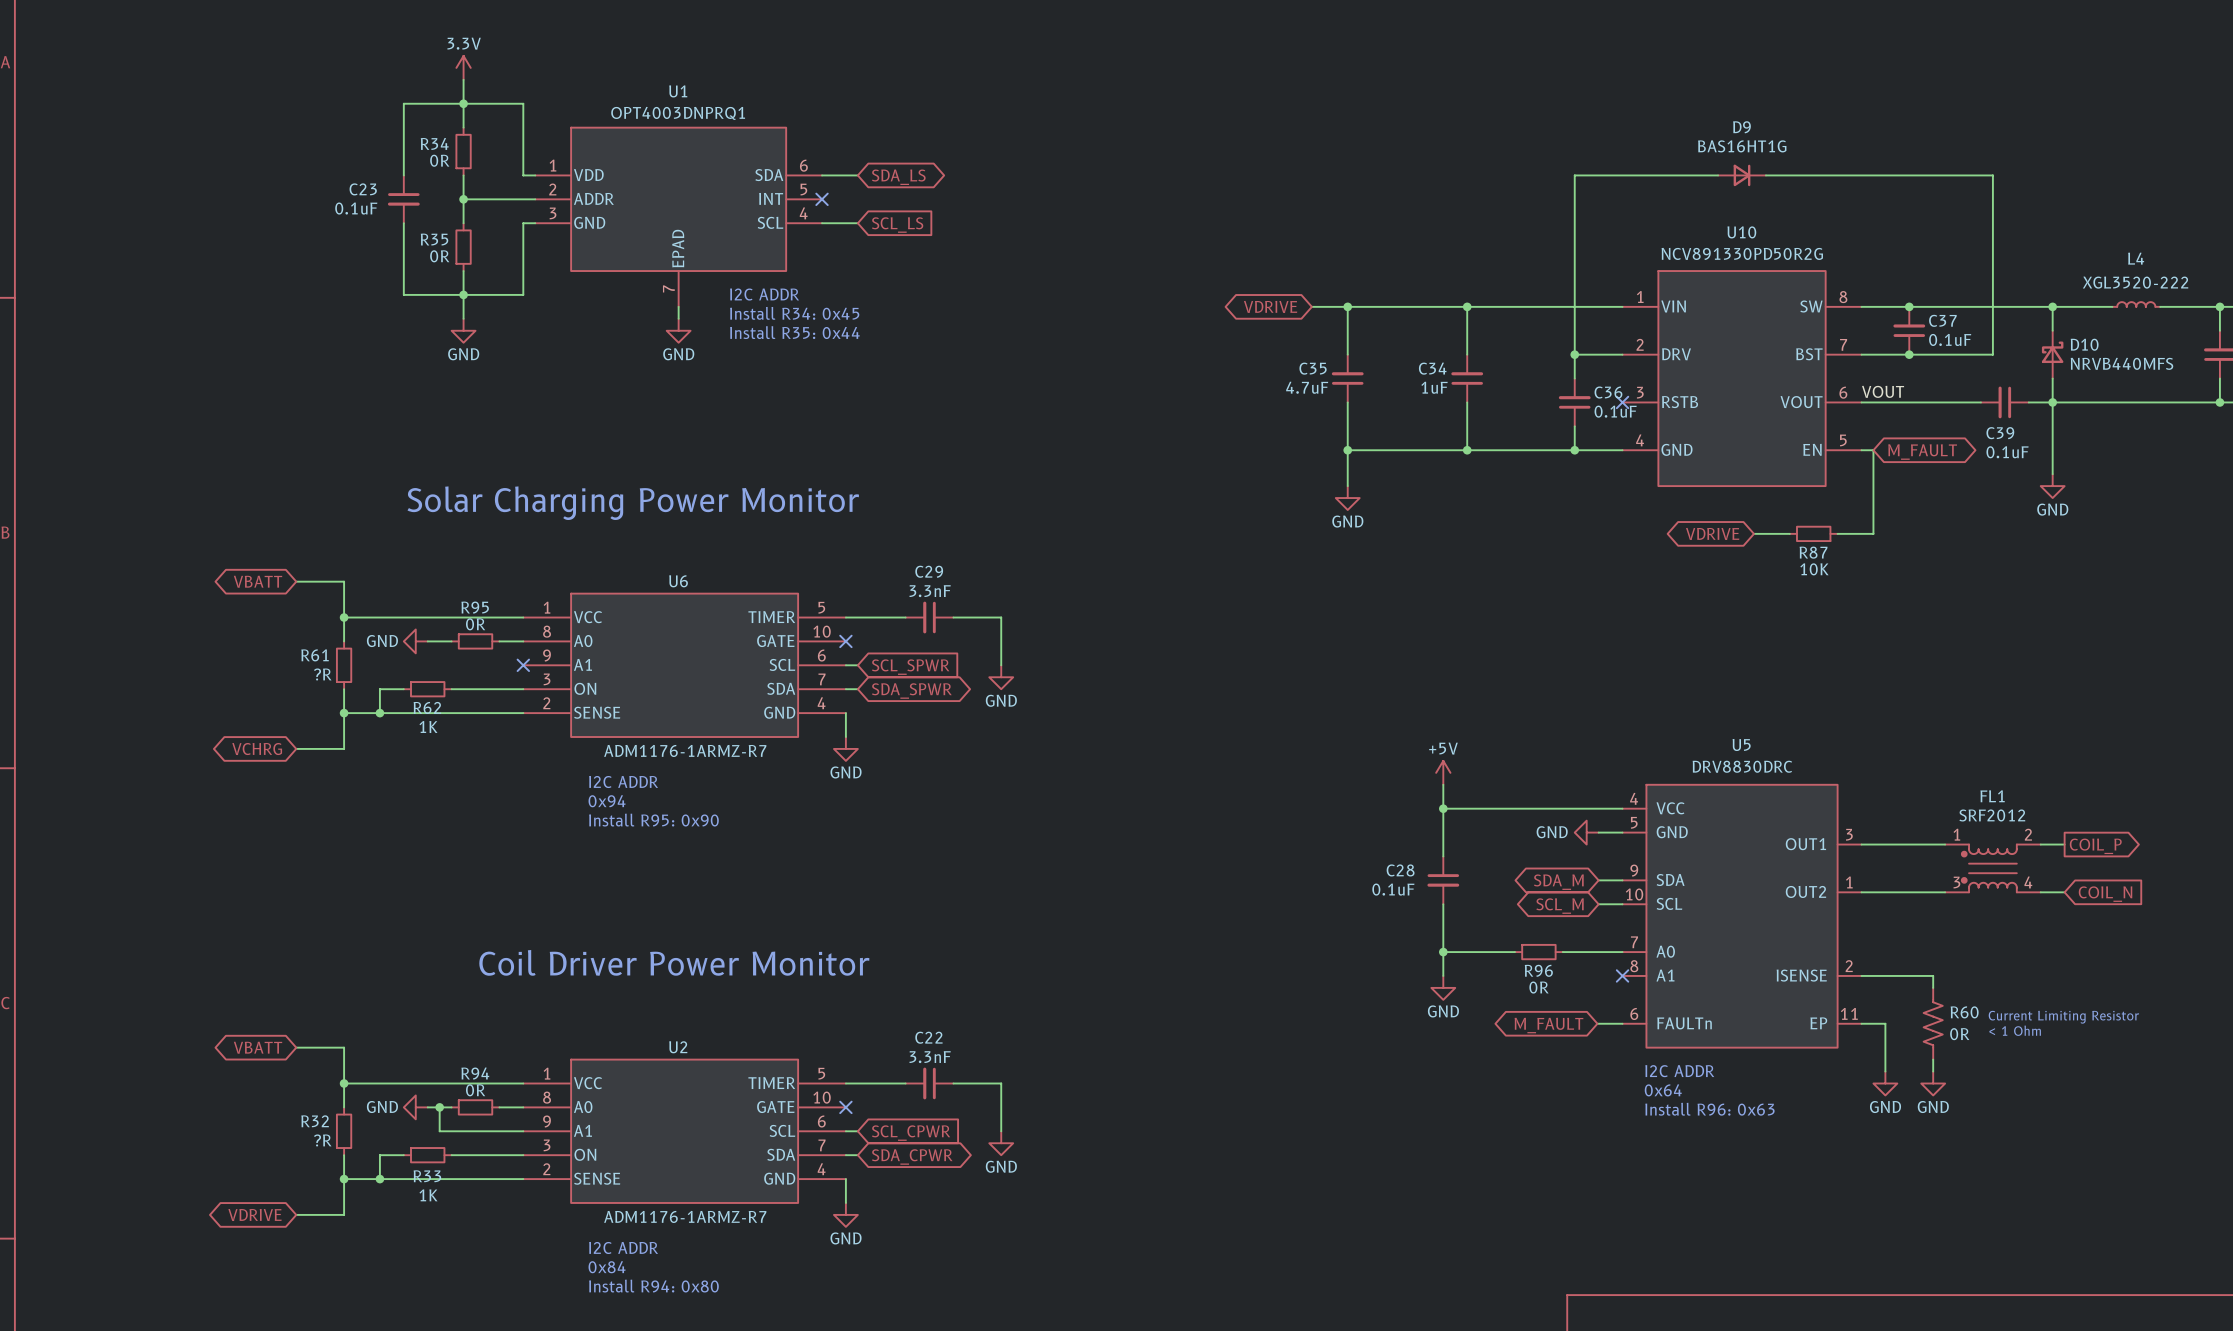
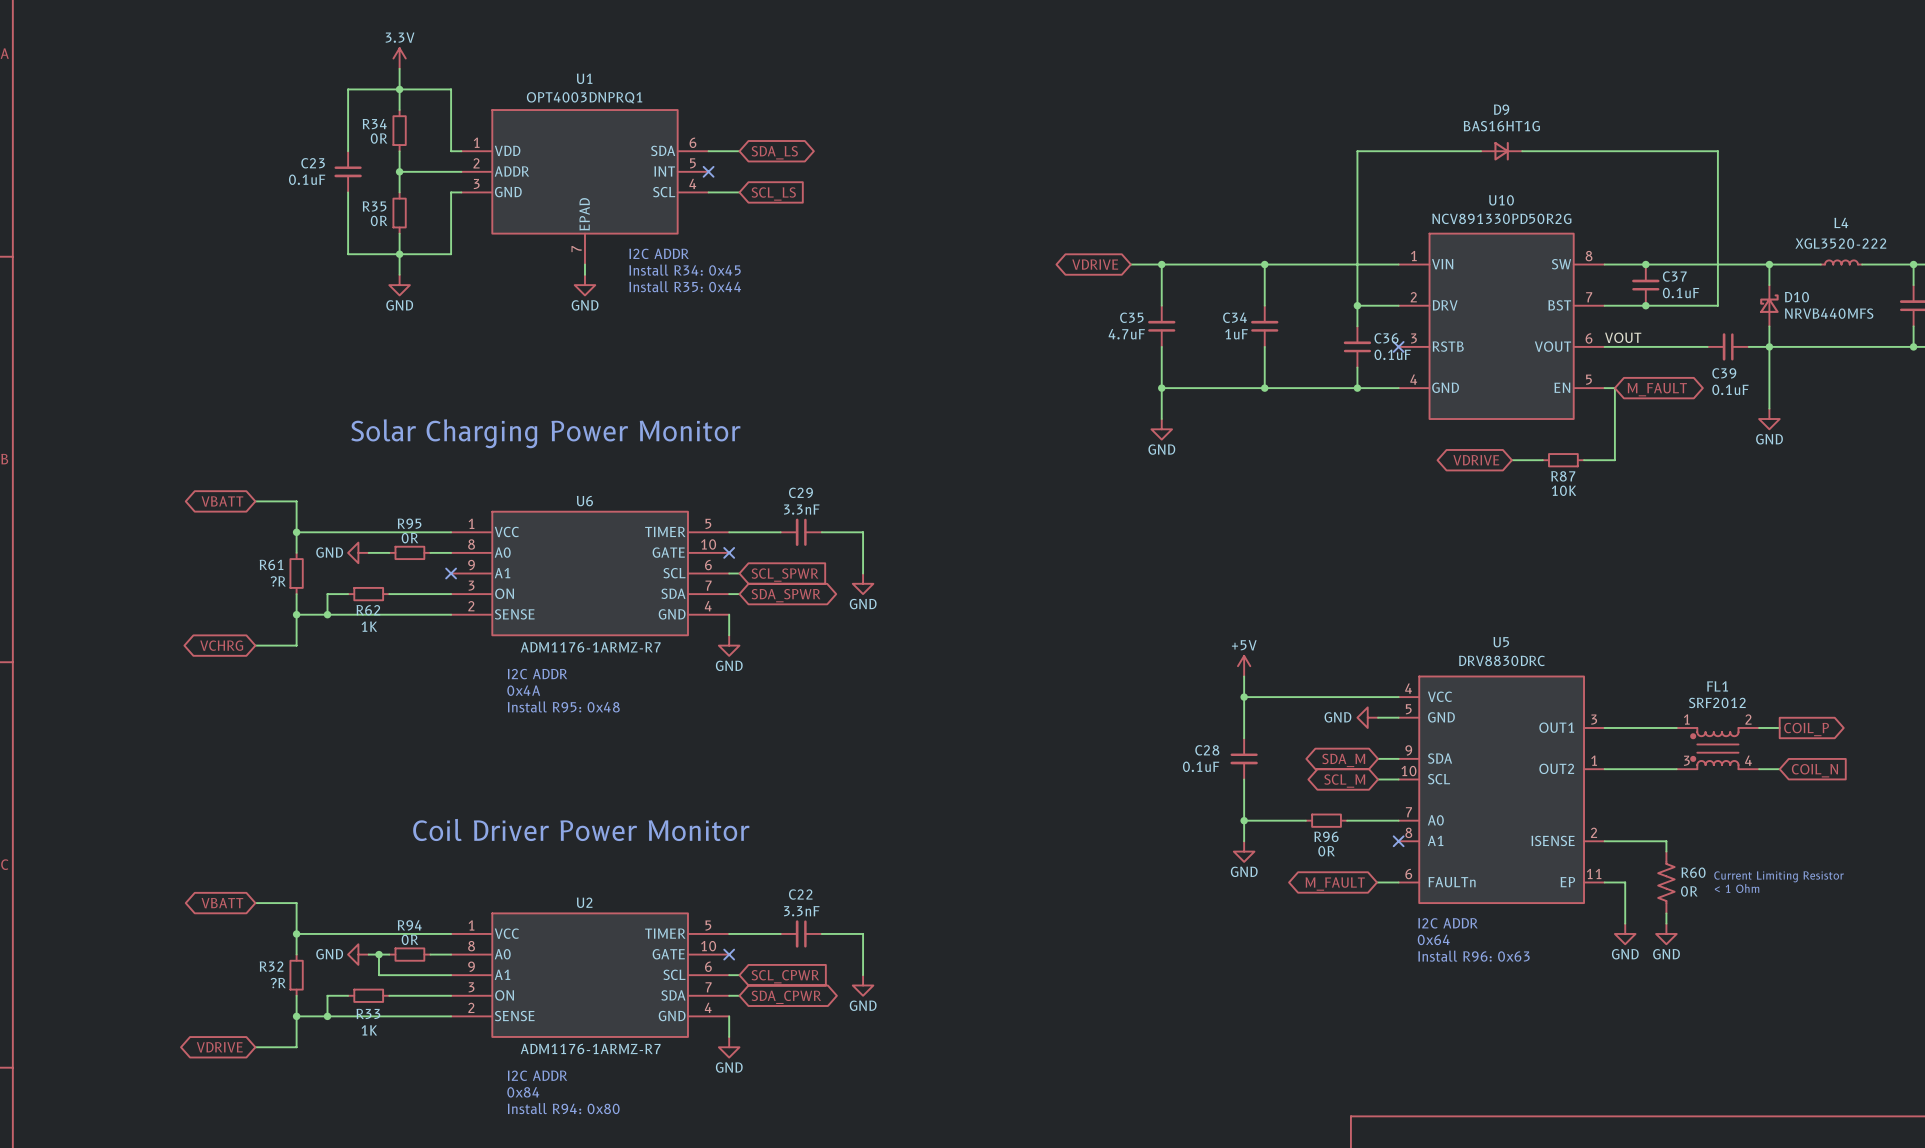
text: 0x94 (607, 801) -> 0x4A (523, 690)
text: Install R95: 0x90 (653, 820) -> Install R95: 0x48 (563, 706)

